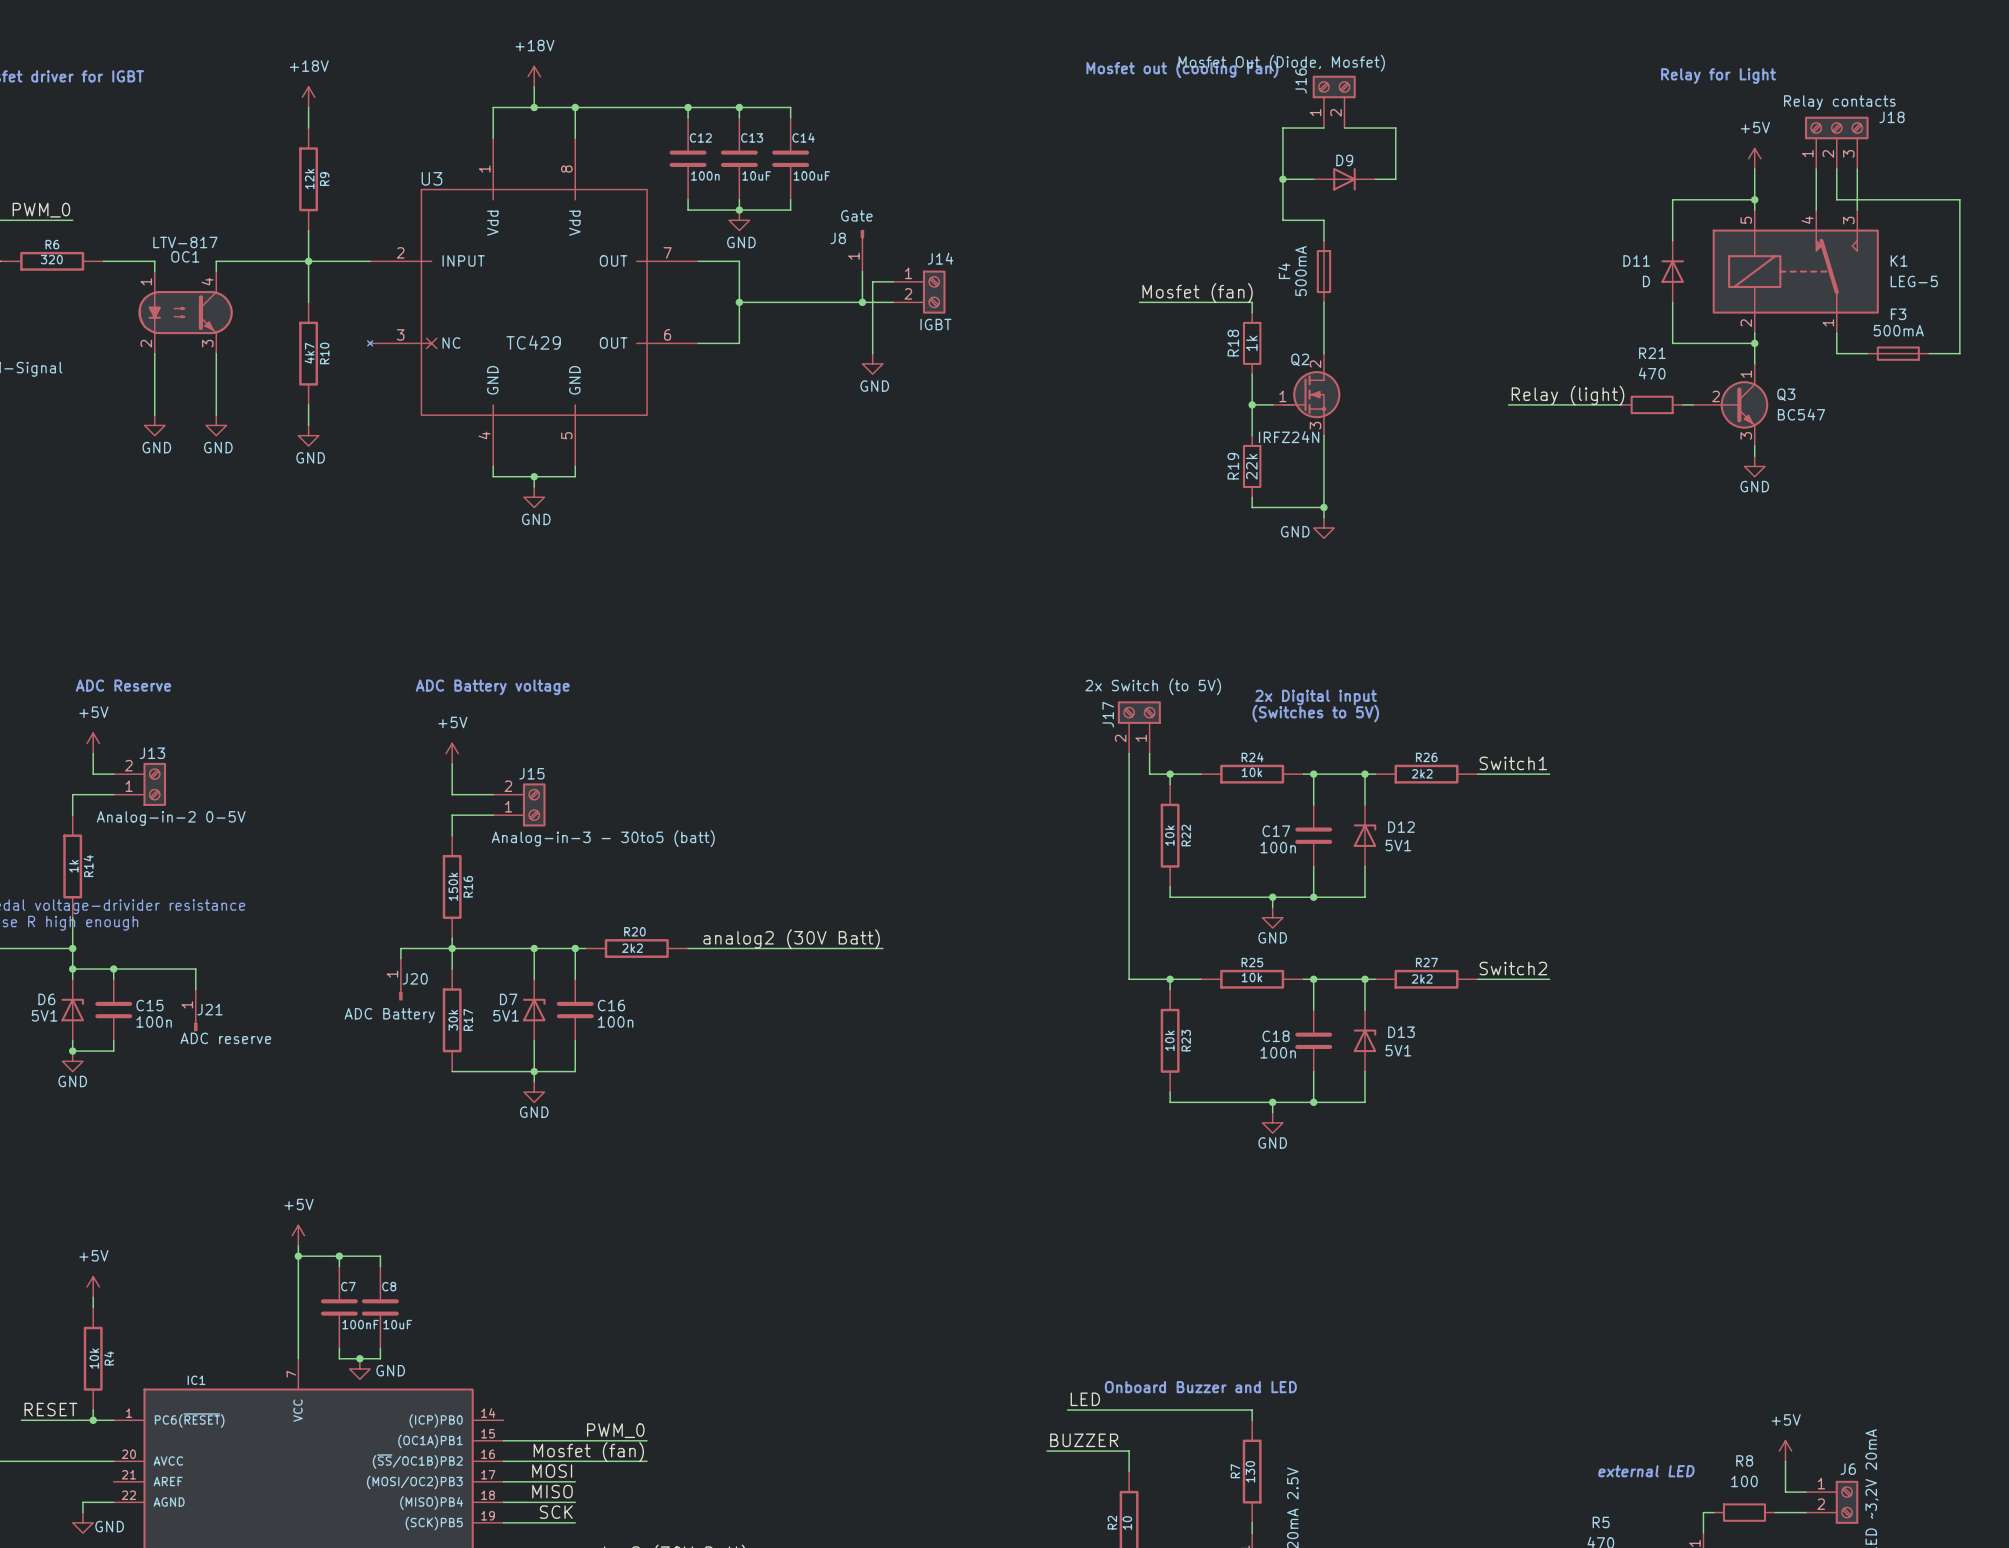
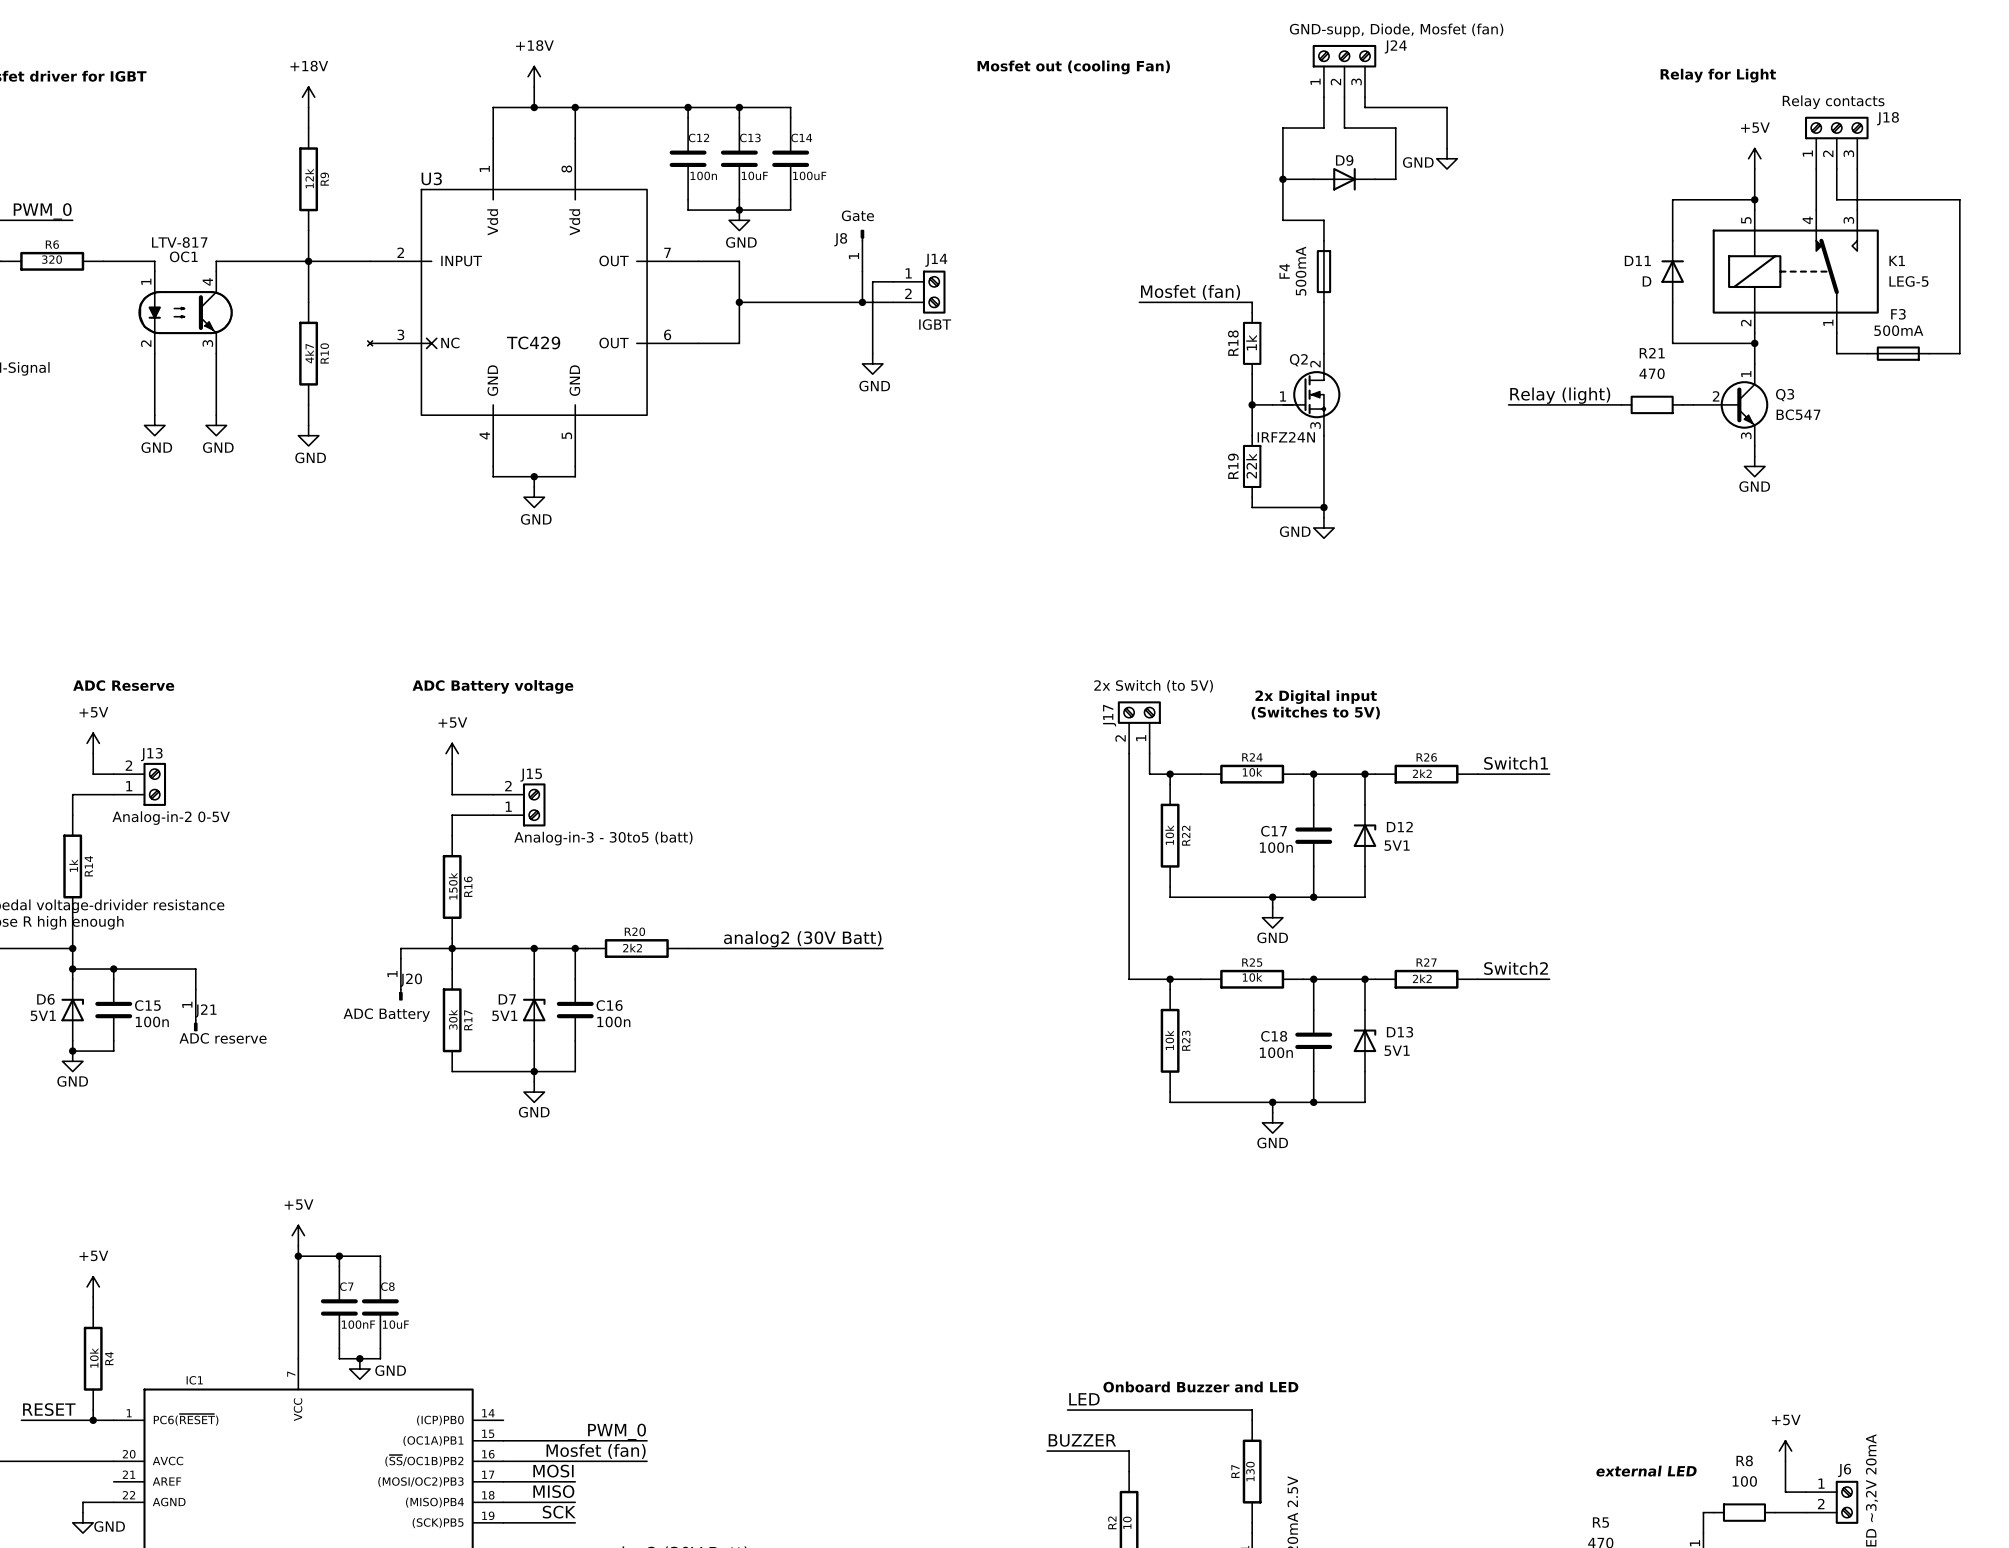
text position: Mosfet out (cooling Fan) (1182, 69) -> Mosfet out (cooling Fan) (1073, 67)
J24: none -> GND-supp, Diode, Mosfet (fan) (1344, 71)
wire: none -> (1364, 97) (1364, 107) (1447, 107) (1447, 148)
J16: Mosfet Out (Diode, Mosfet) (1334, 101) -> none
power symbol: none -> GND (1447, 158)

